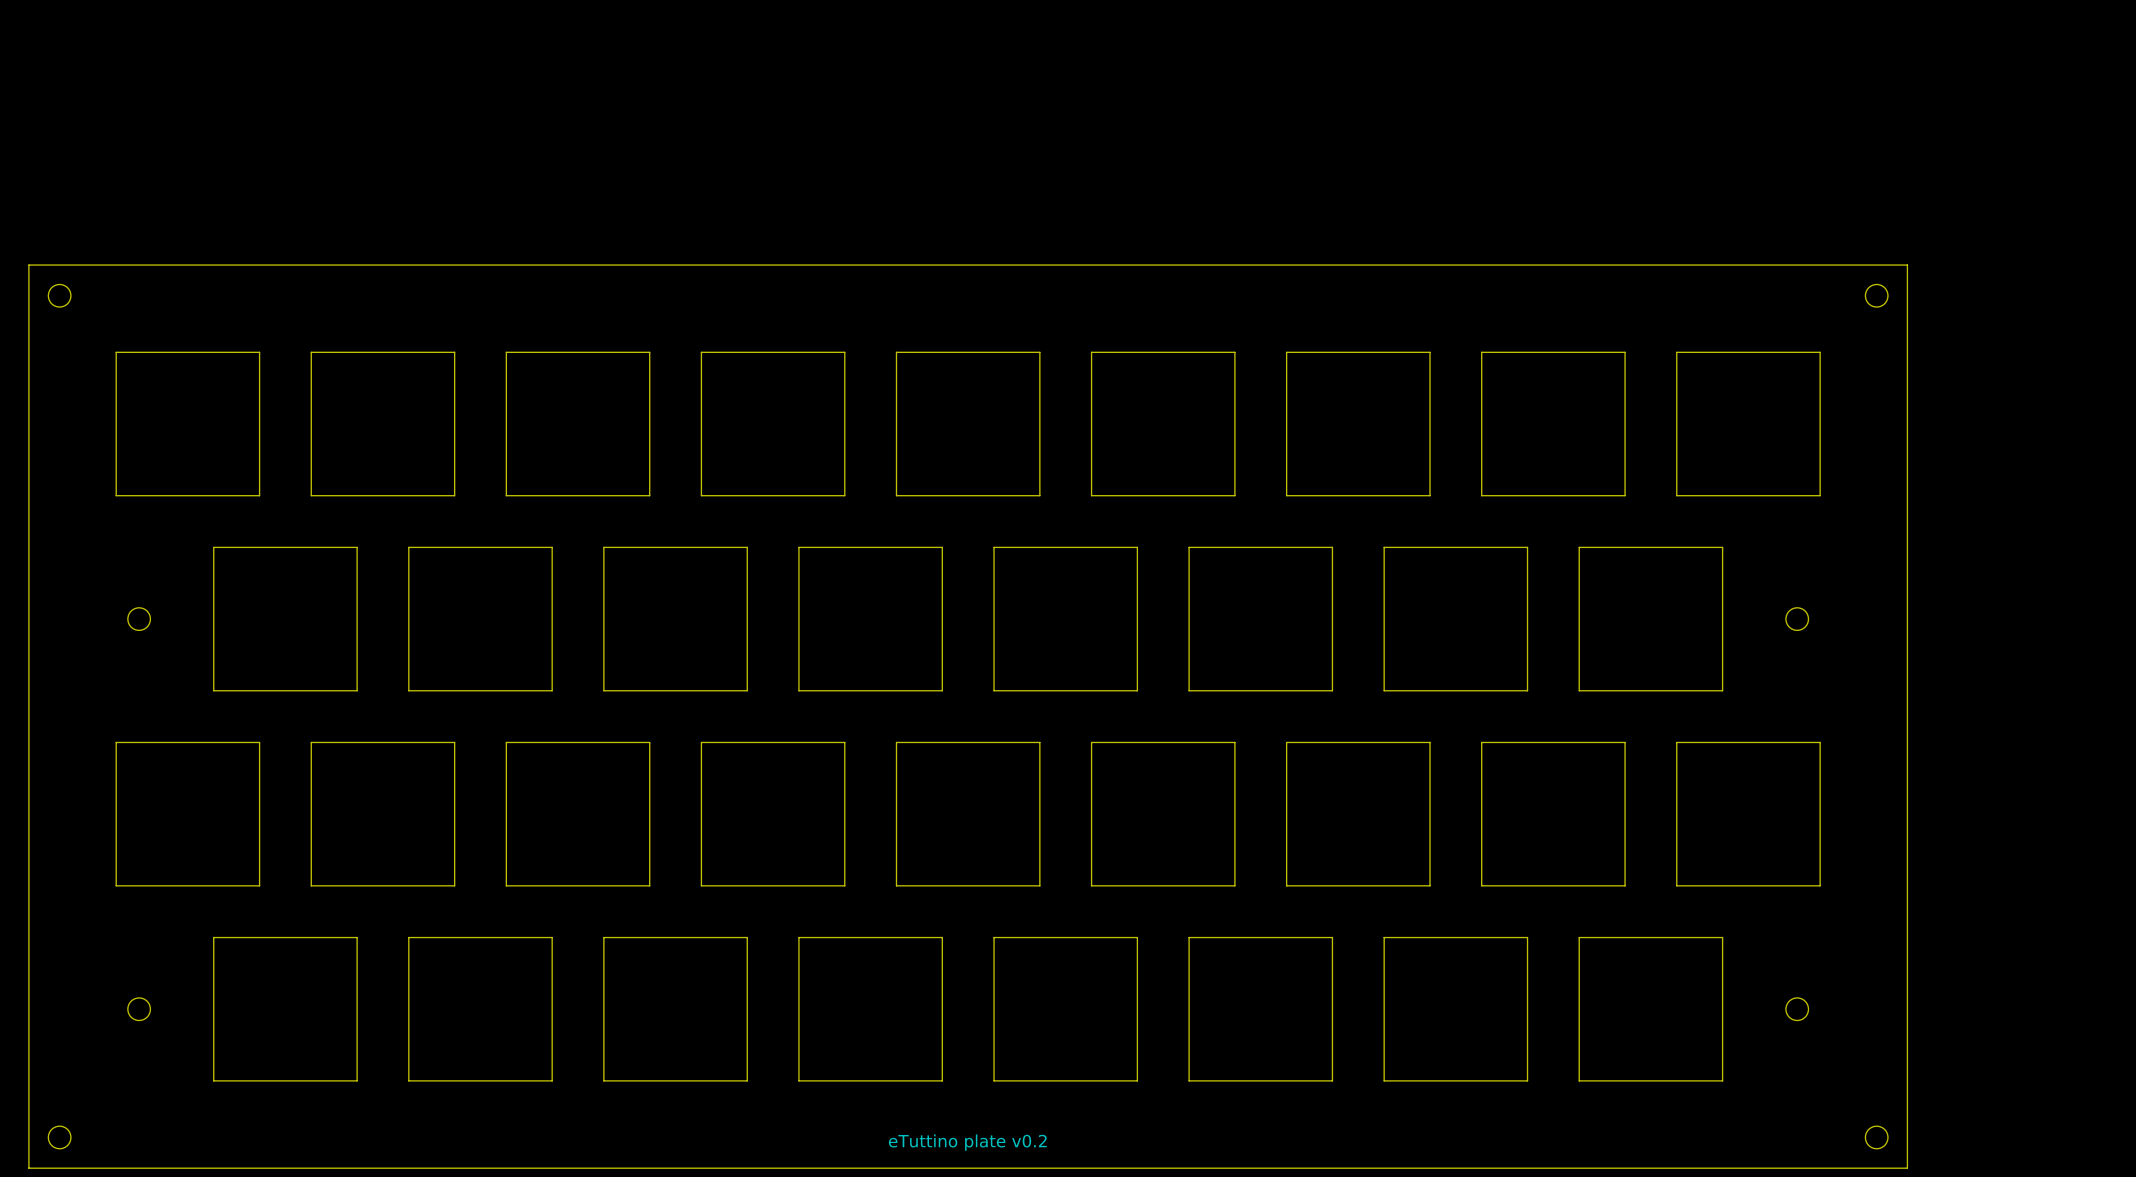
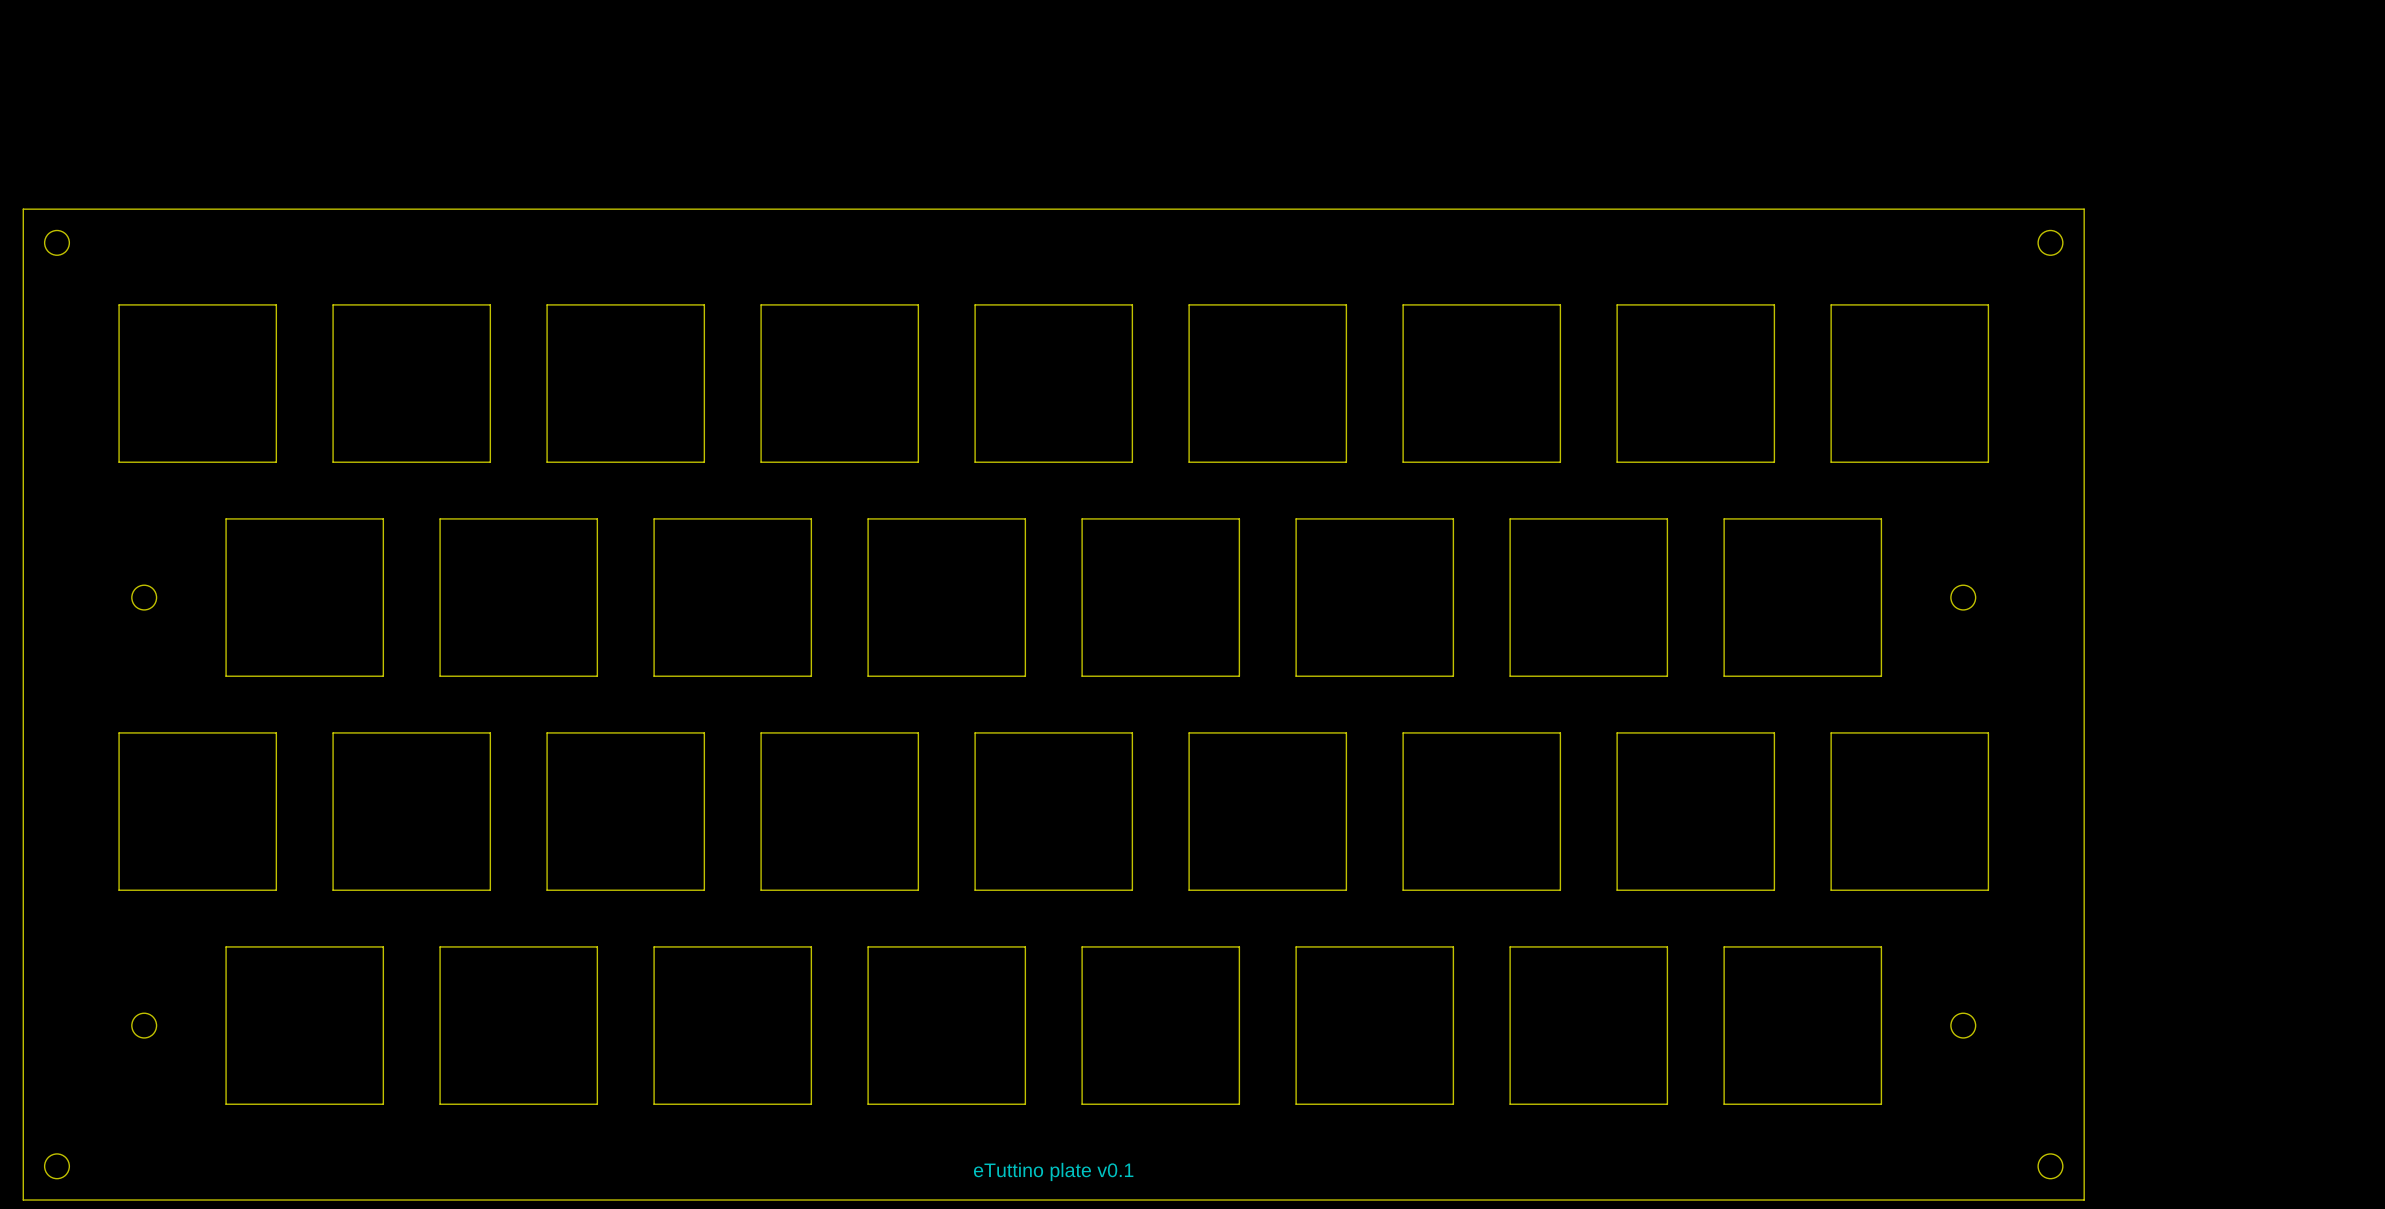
text: eTuttino plate v0.2 (967, 1142) -> eTuttino plate v0.1 (1053, 1171)

